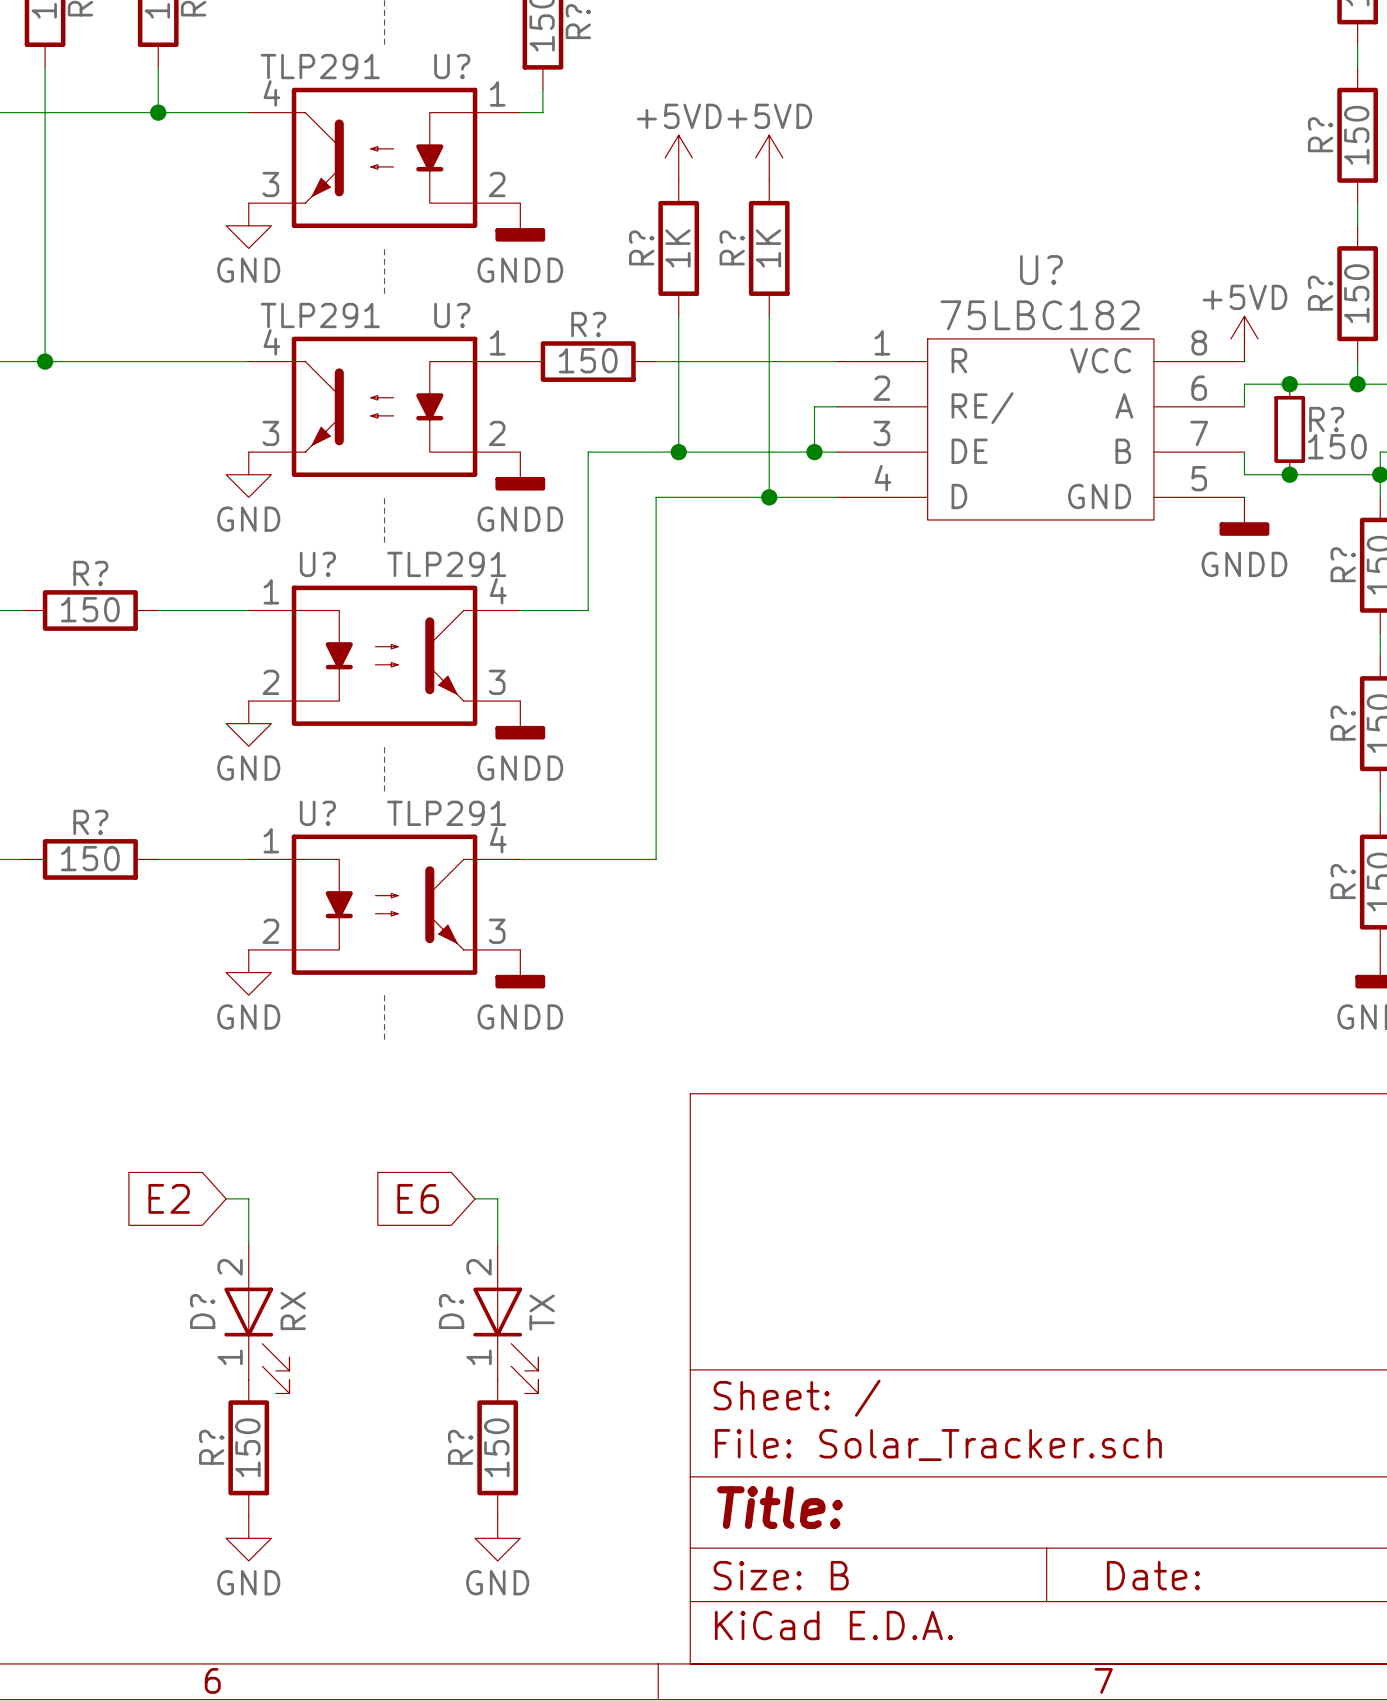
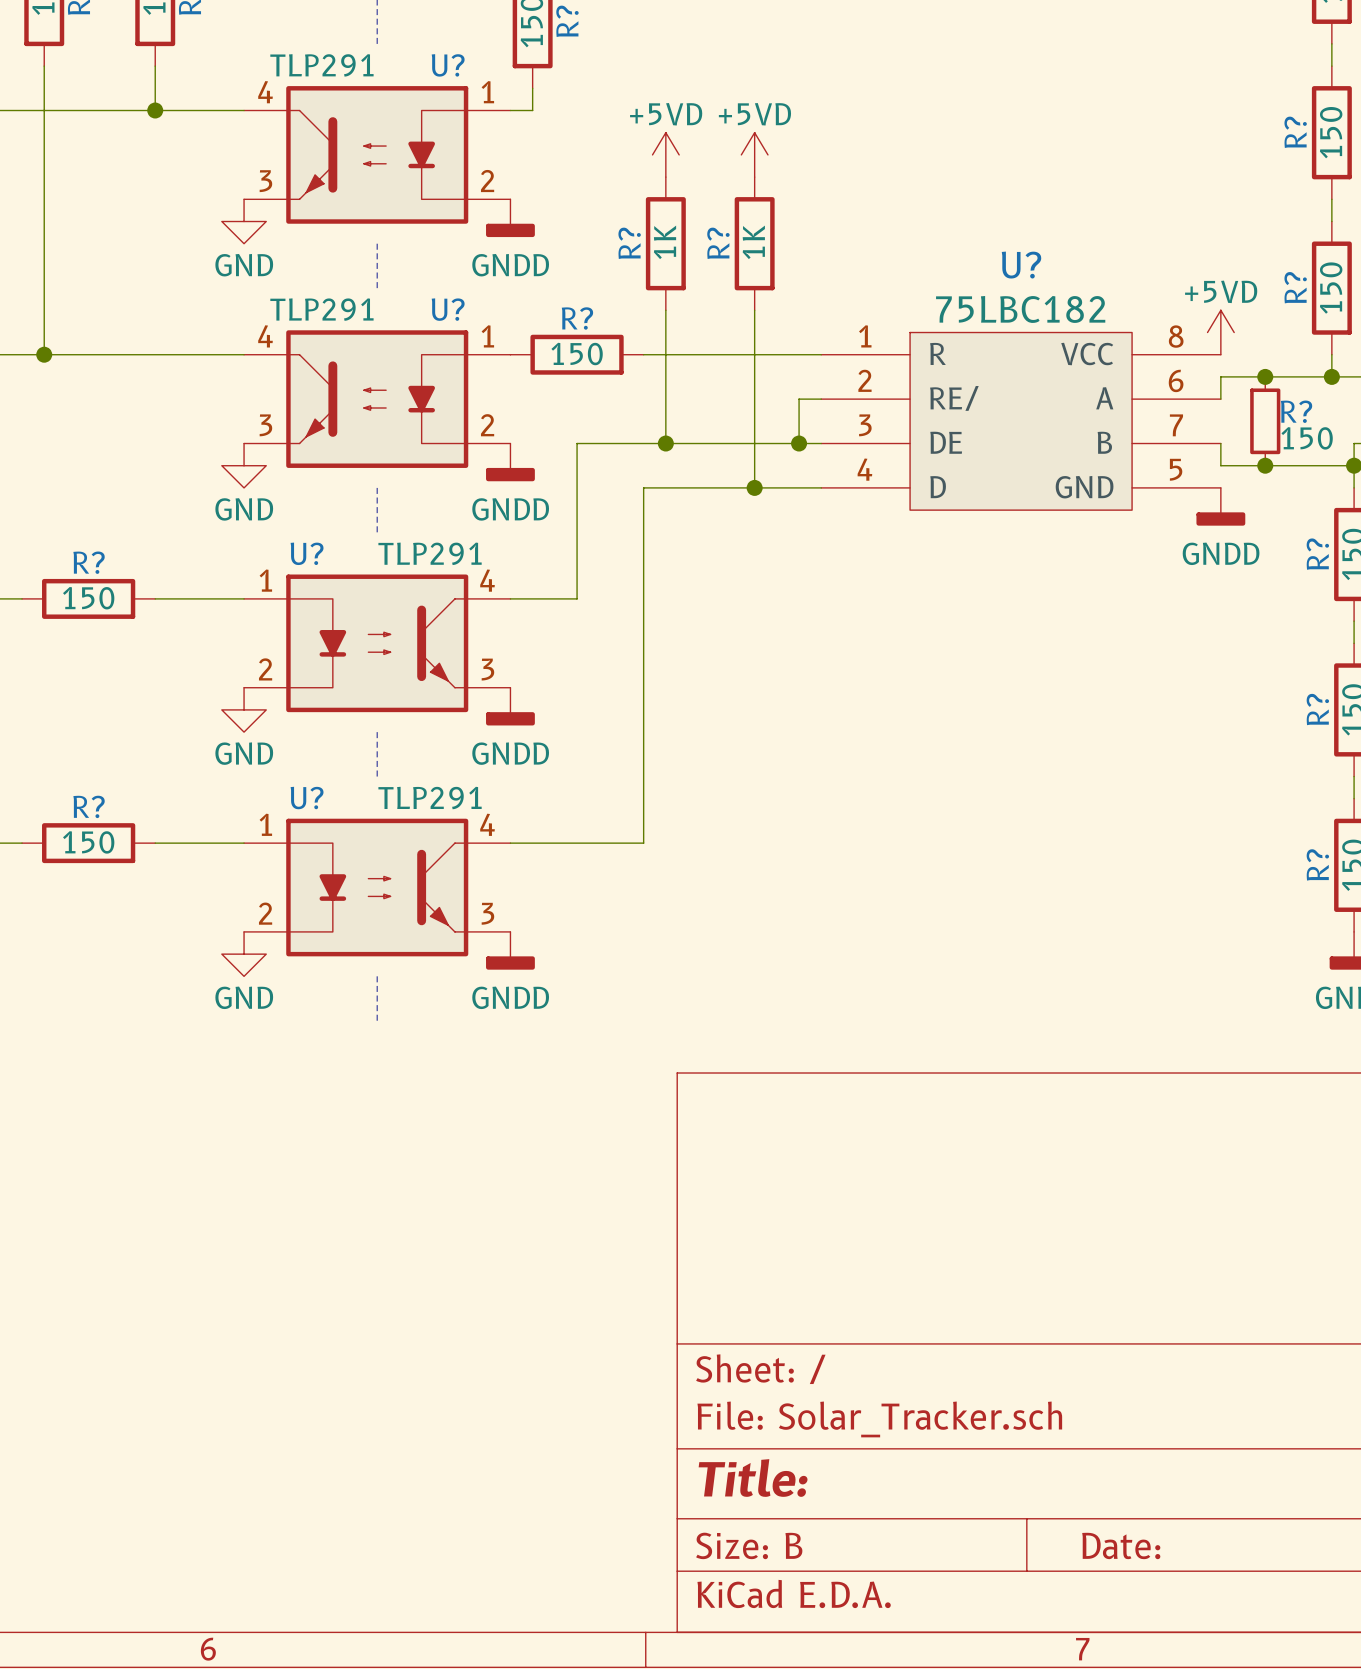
global label: E2 (169, 1198) -> none
wire: (226, 1198) (248, 1198) (248, 1244) -> none
global label: E6 (418, 1198) -> none
wire: (475, 1198) (497, 1198) (497, 1244) -> none
D?: RX (256, 1318) -> none
D?: TX (505, 1318) -> none
R?: 150 (248, 1447) -> none
R?: 150 (497, 1447) -> none
power symbol: GND (248, 1538) -> none
power symbol: GND (497, 1538) -> none

